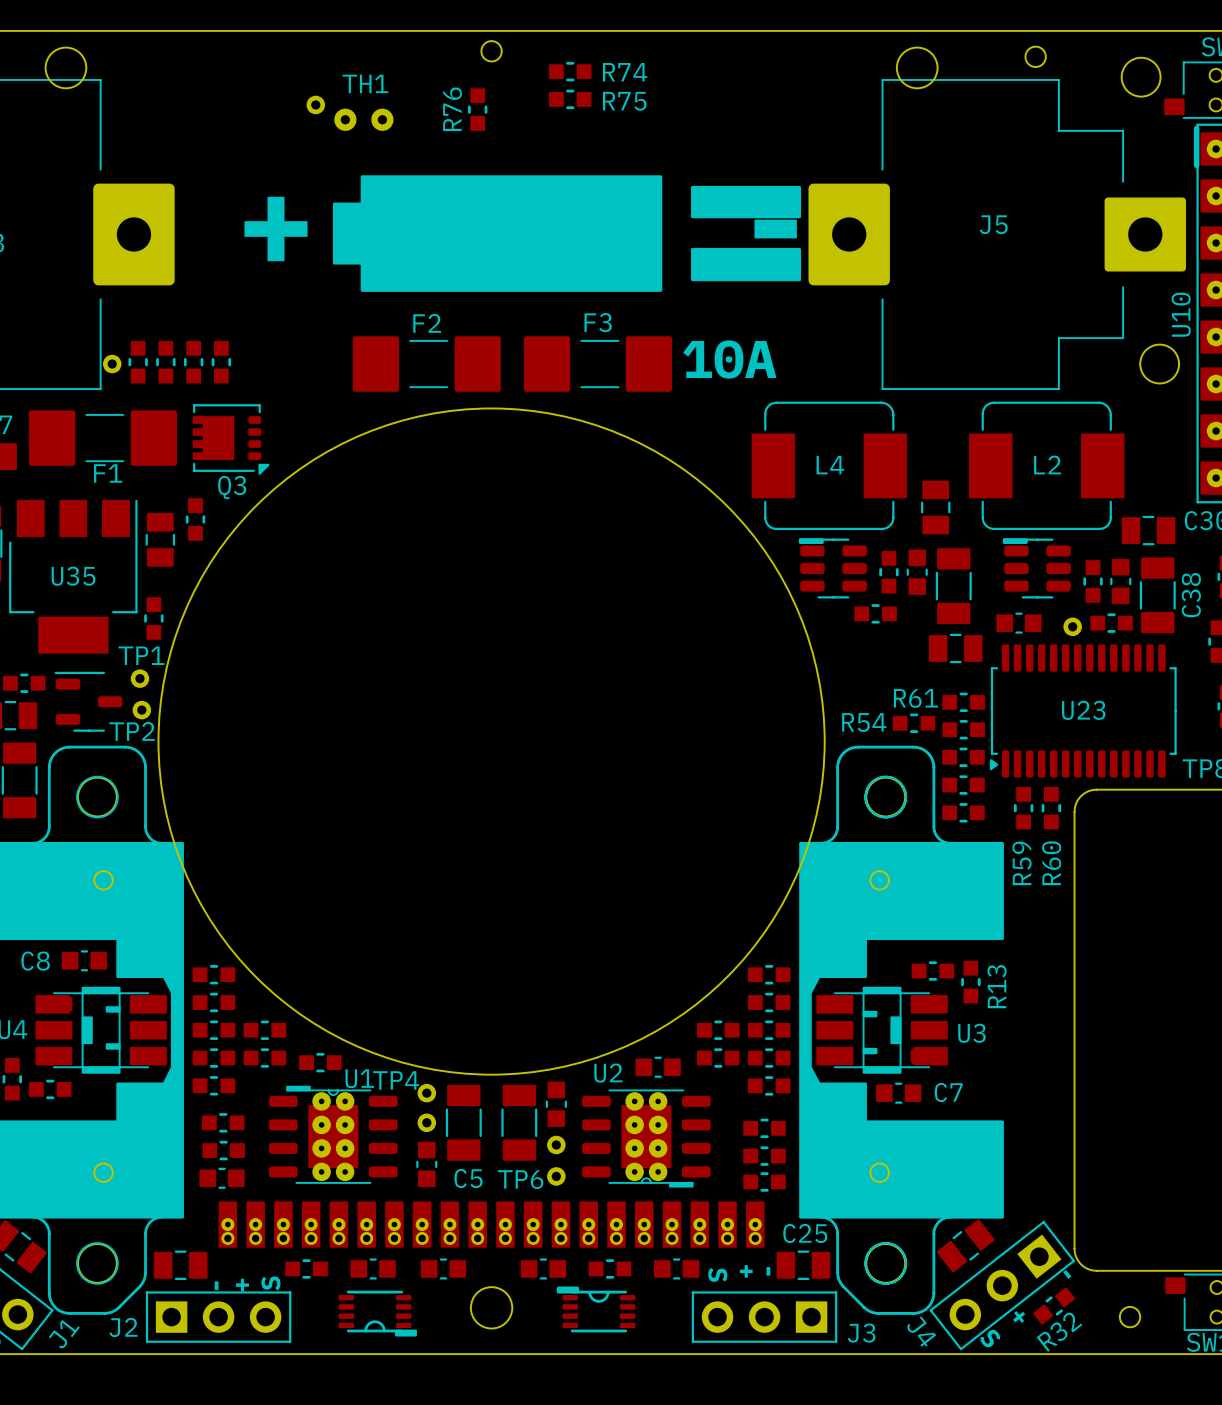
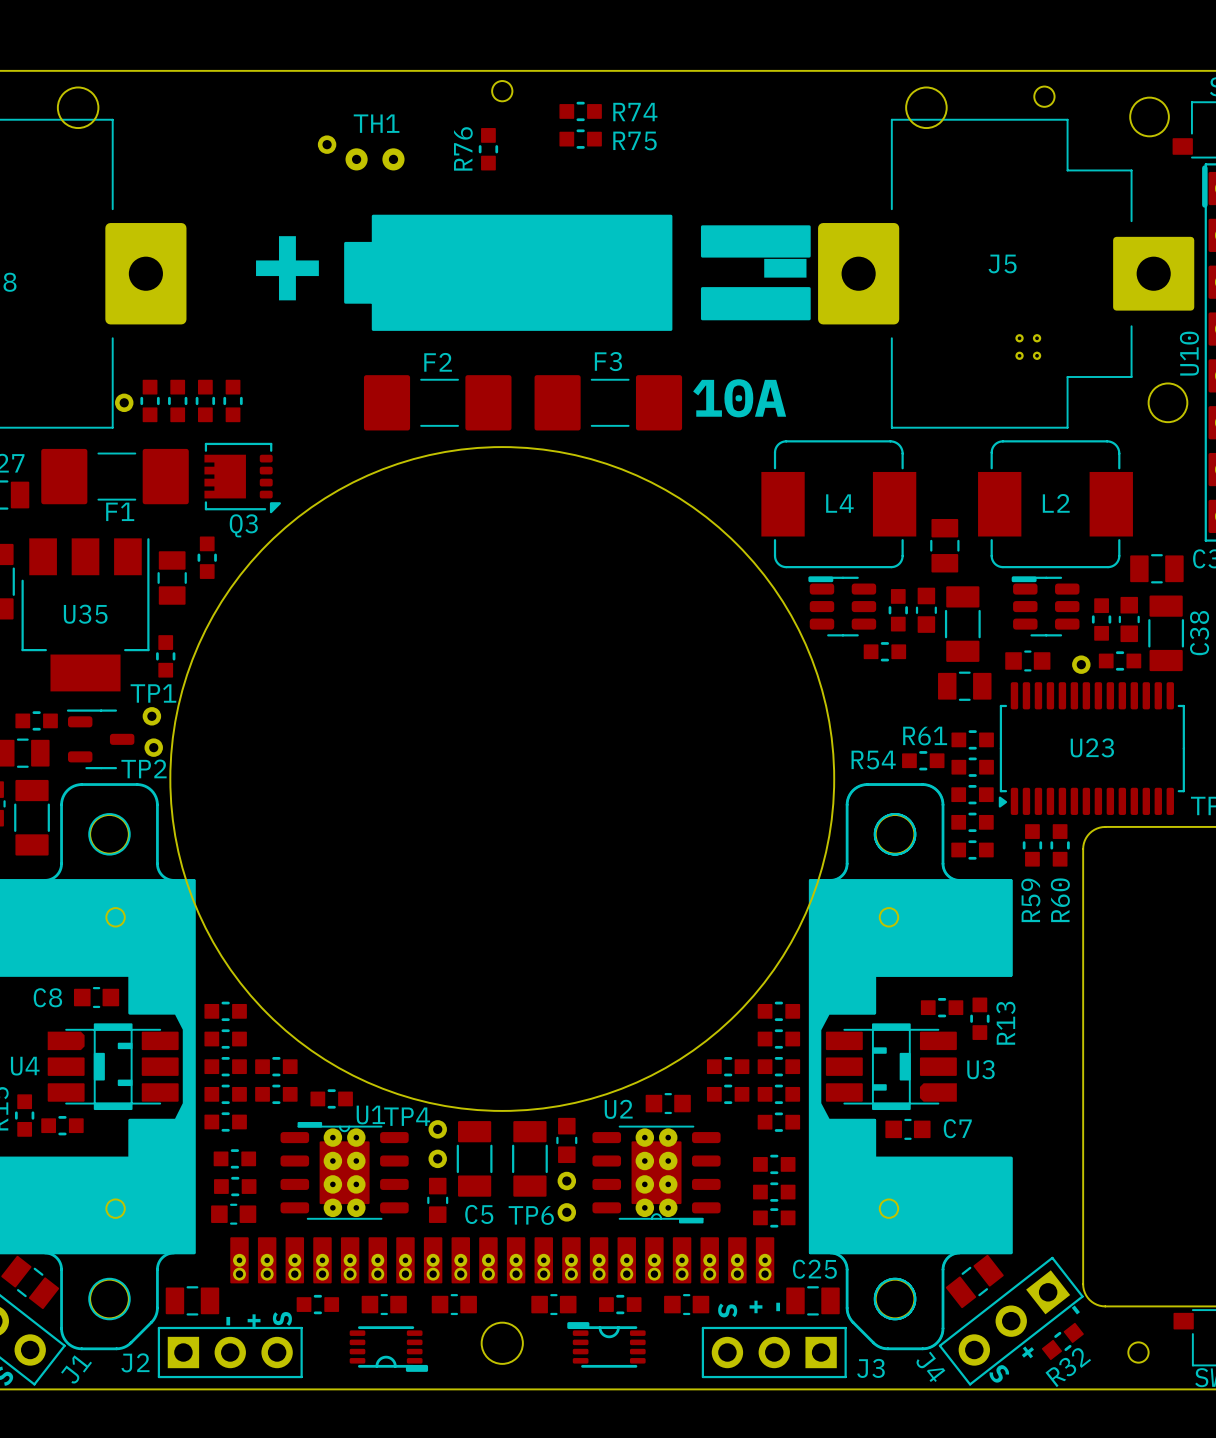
part: none -> (1028, 347)

